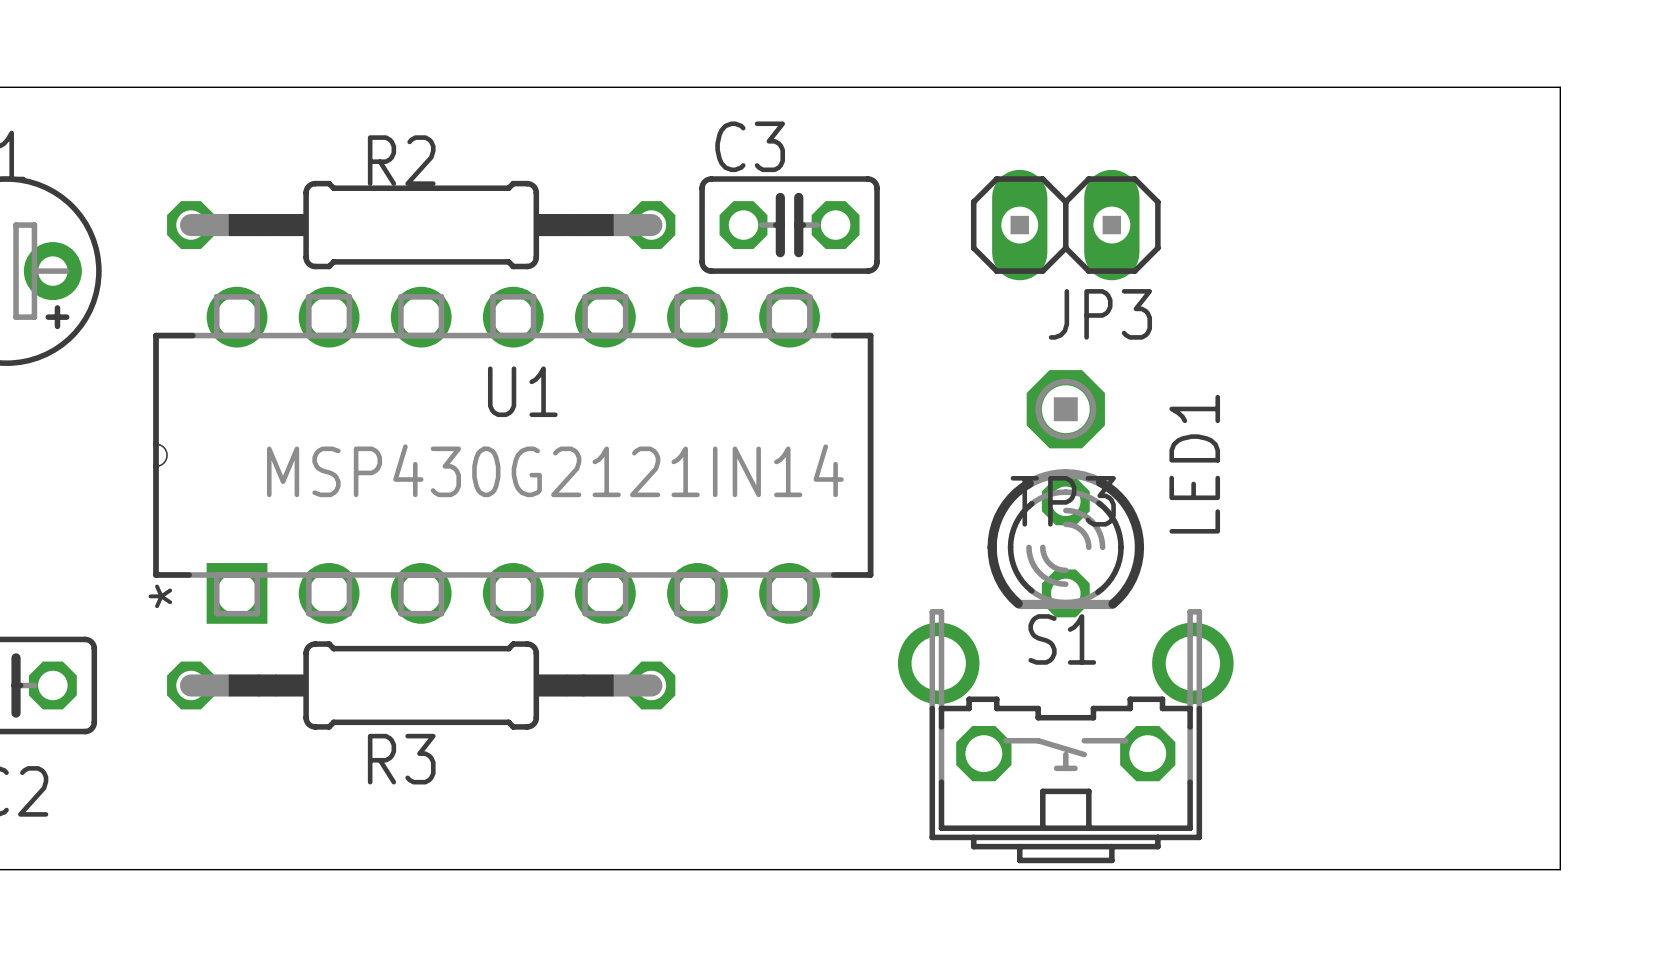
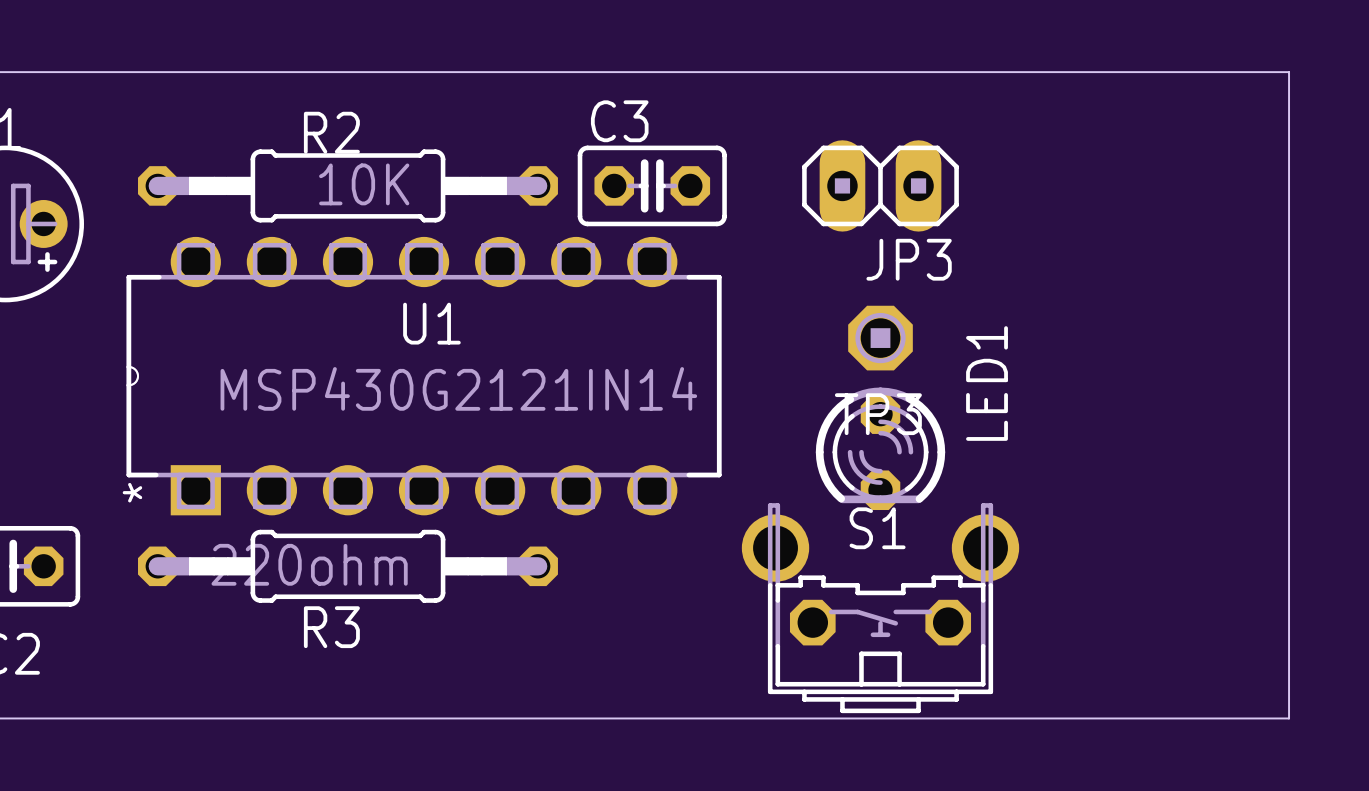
R2 value: none -> 10K (364, 184)
R3 value: none -> 220ohm (309, 564)

